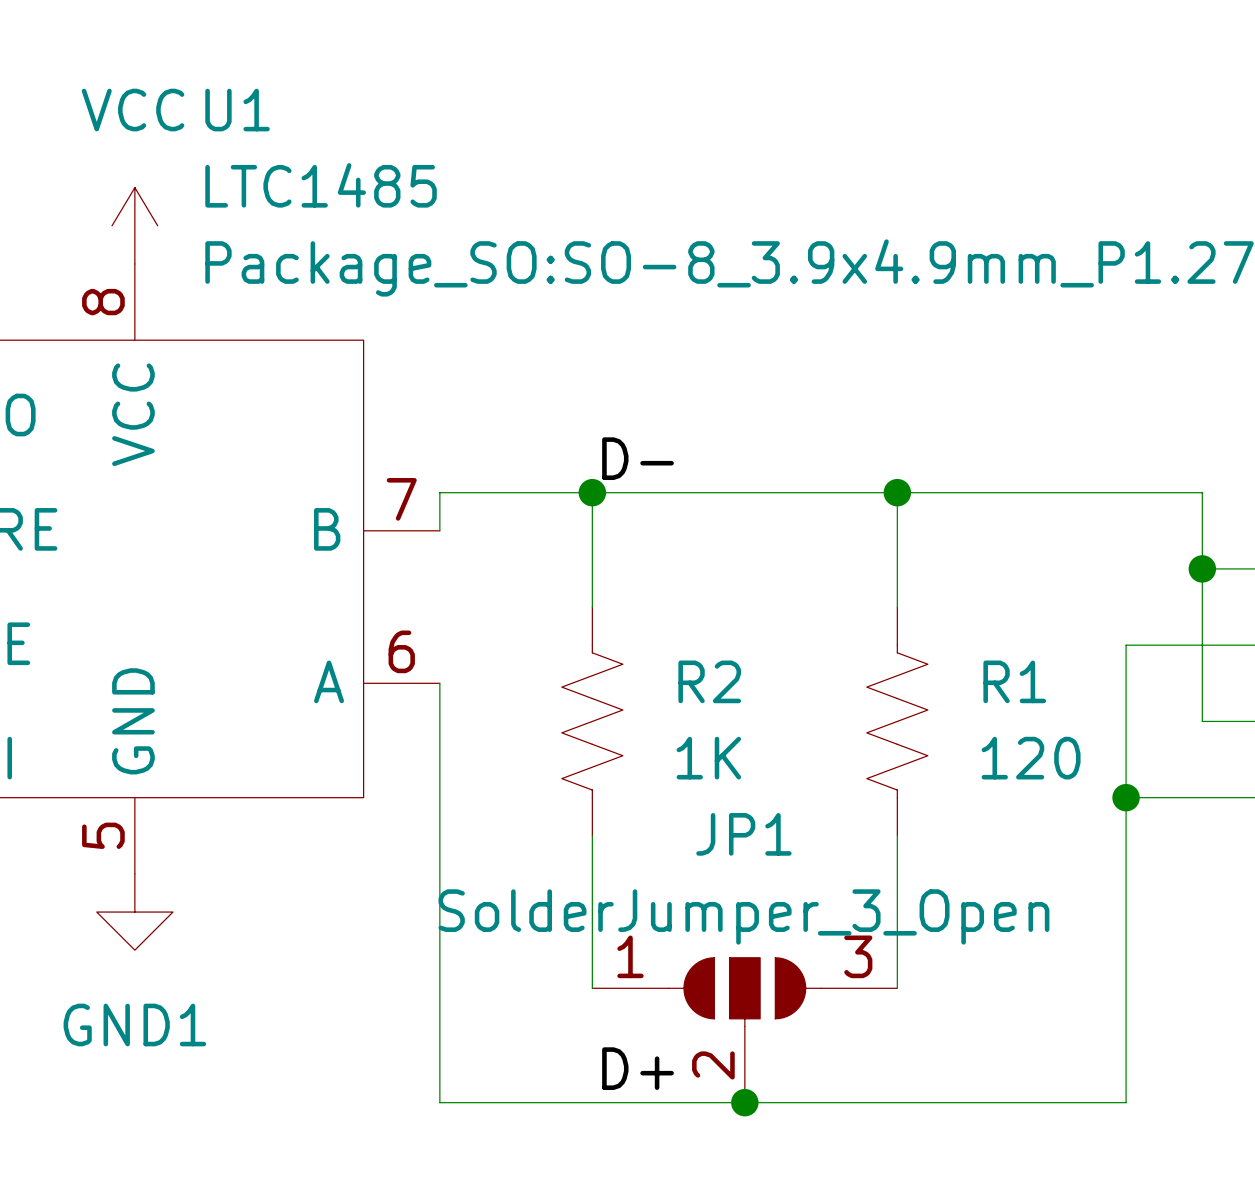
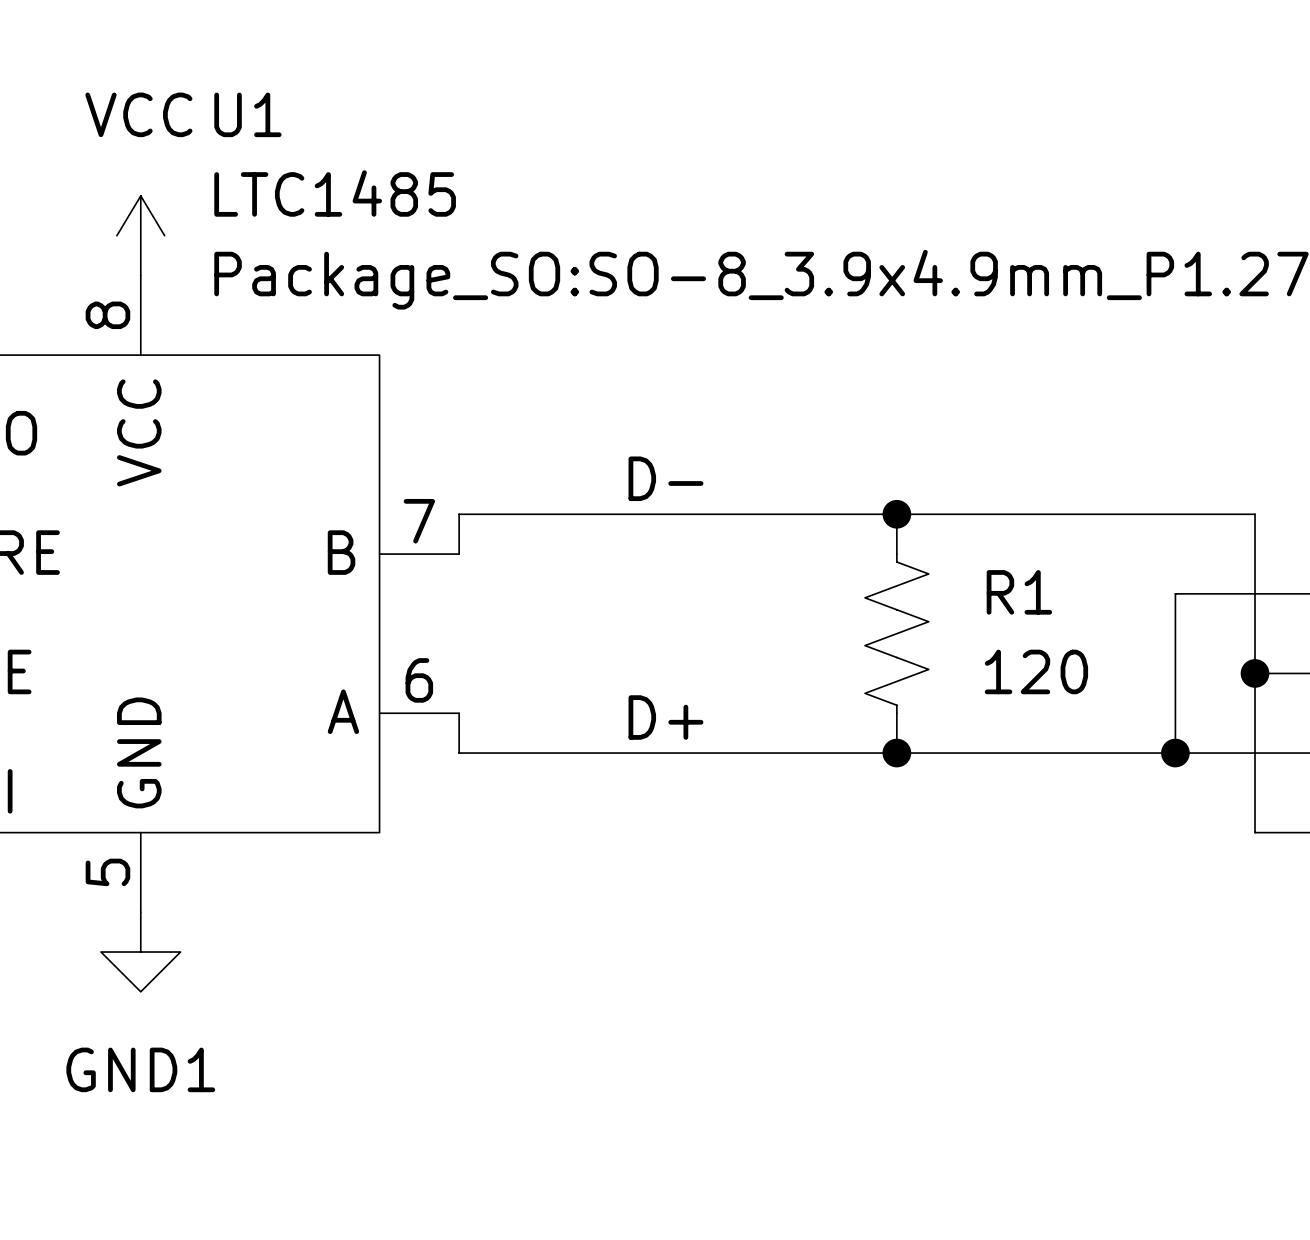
wire: (592, 492) (592, 607) -> none
junction: (592, 492) -> none
wire: (897, 492) (897, 607) -> none
junction position: (897, 492) -> (896, 514)
junction position: (1202, 568) -> (1255, 673)
wire: (1126, 645) (1202, 645) -> (1175, 673) (1175, 593) (1255, 593)
wire: (439, 721) (439, 1102) (1126, 1102) (1126, 721) -> (459, 753) (1255, 753) (1255, 832)
R2: 1K (592, 721) -> none
junction: none -> (896, 753)
R1 position: (897, 721) -> (896, 633)
wire: (1126, 797) (1202, 797) -> none
junction position: (1126, 797) -> (1175, 753)
wire: (592, 835) (592, 988) -> none
wire: (897, 835) (897, 988) -> none
JP1: SolderJumper_3_Open (744, 1030) -> none
label position: D+ (638, 1068) -> D+ (665, 717)
junction: (744, 1102) -> none

